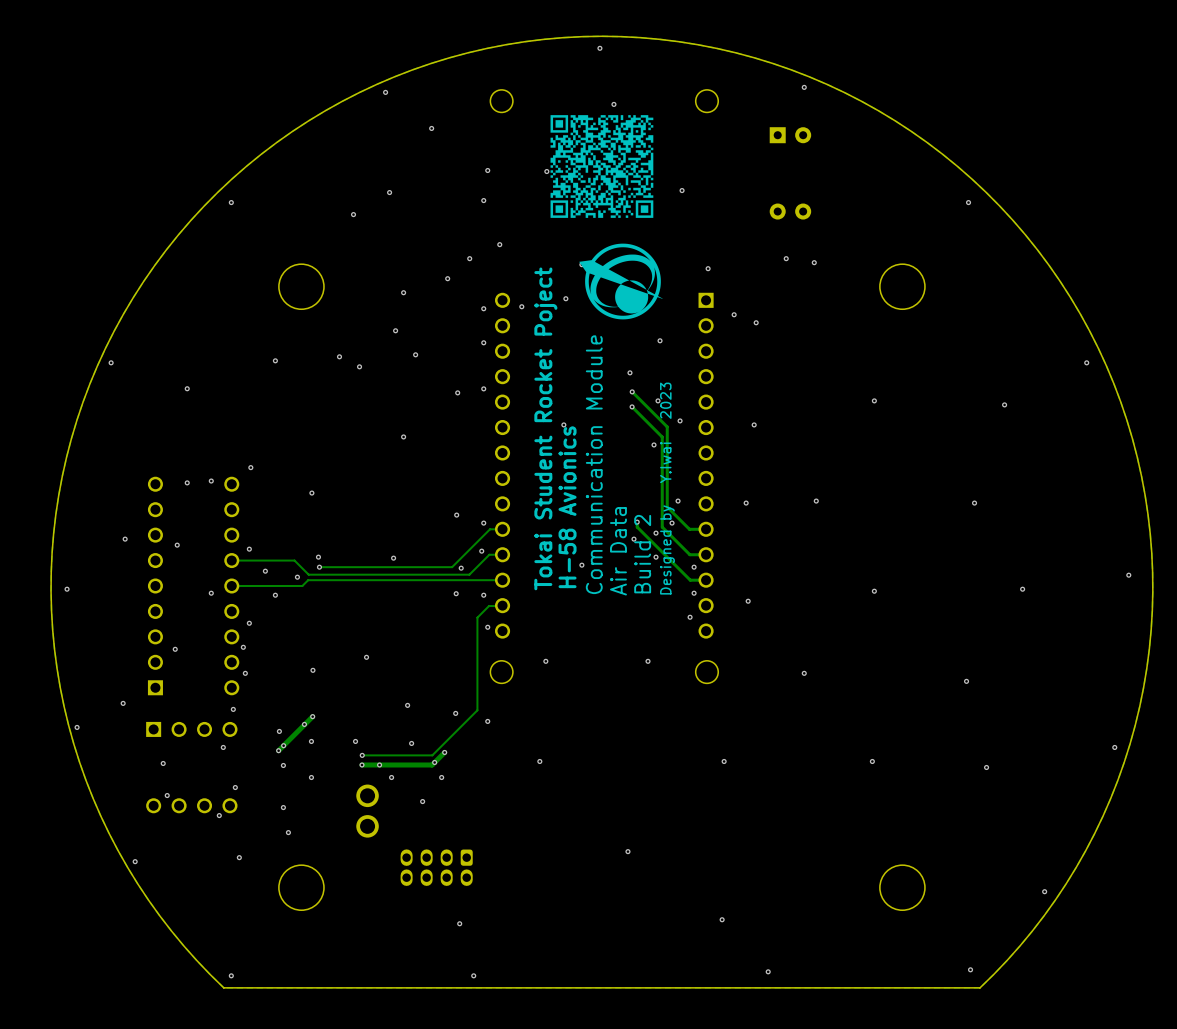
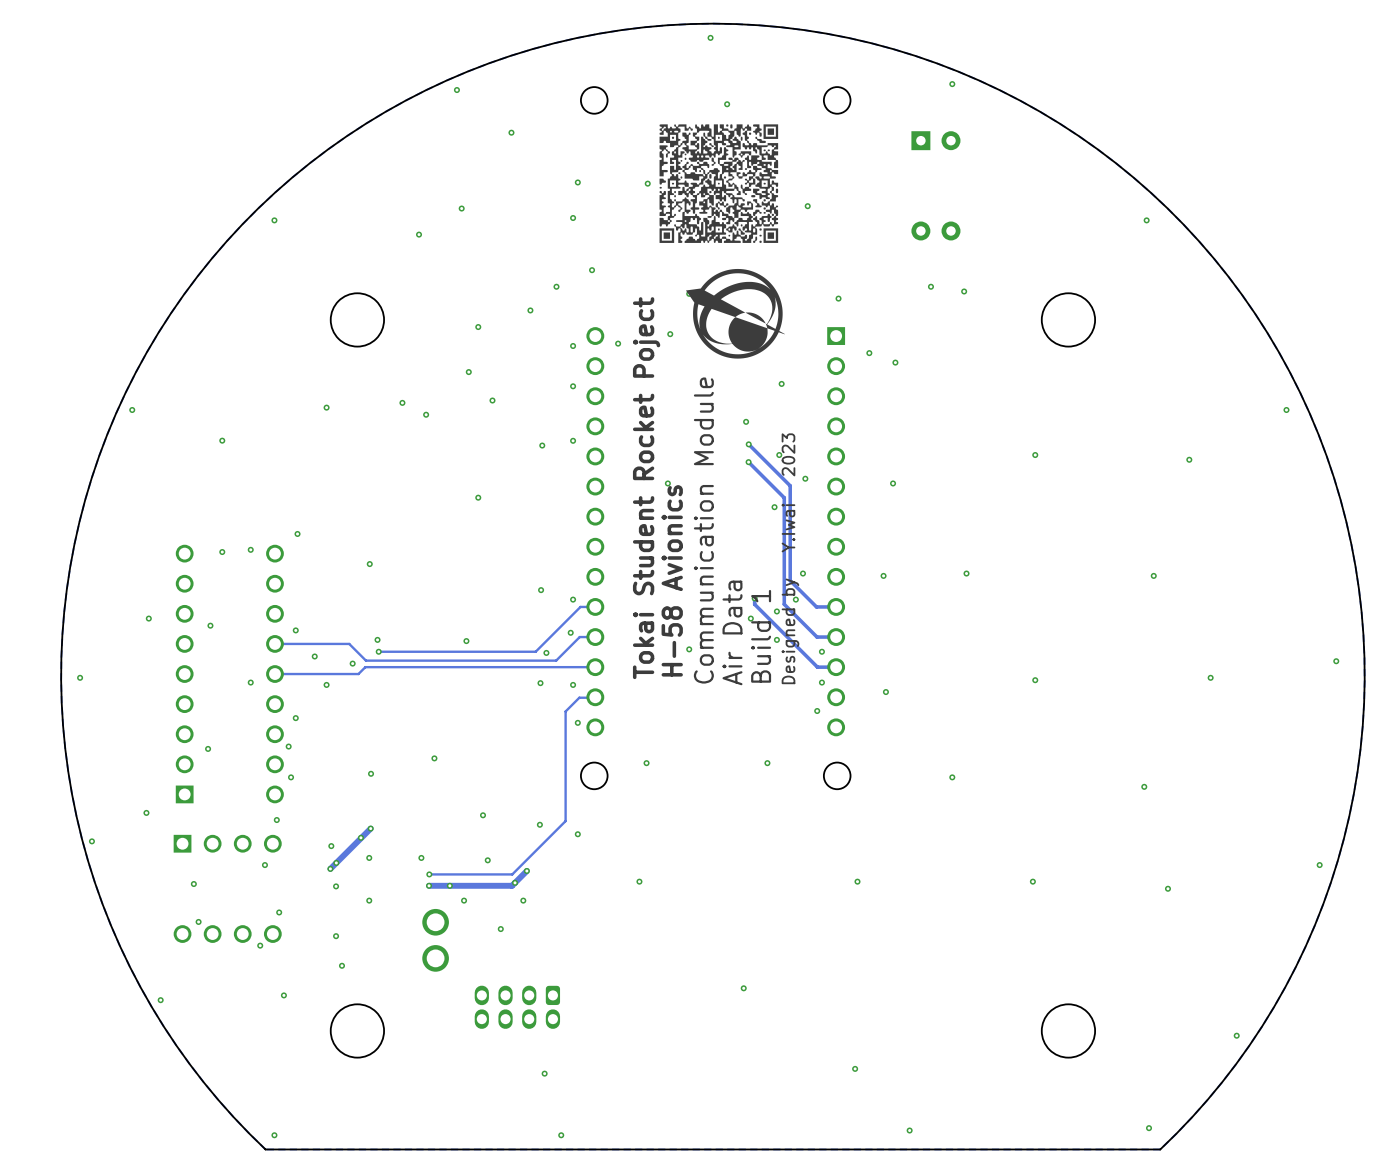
drawing shape: [550, 115, 654, 218] -> [659, 124, 779, 243]
text: Build 2 (642, 554) -> Build 1 (761, 636)

